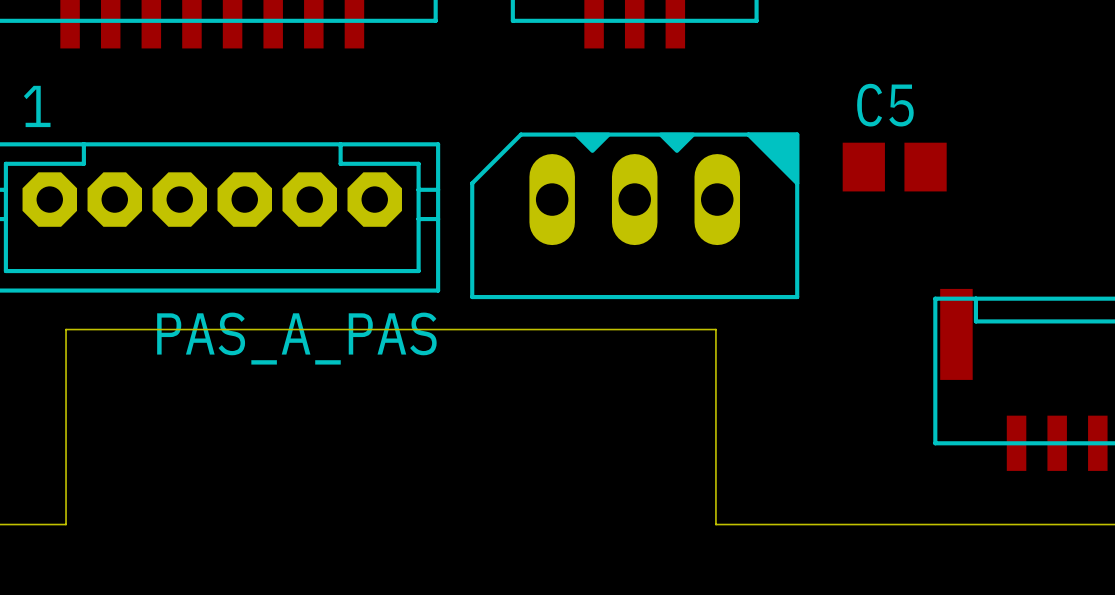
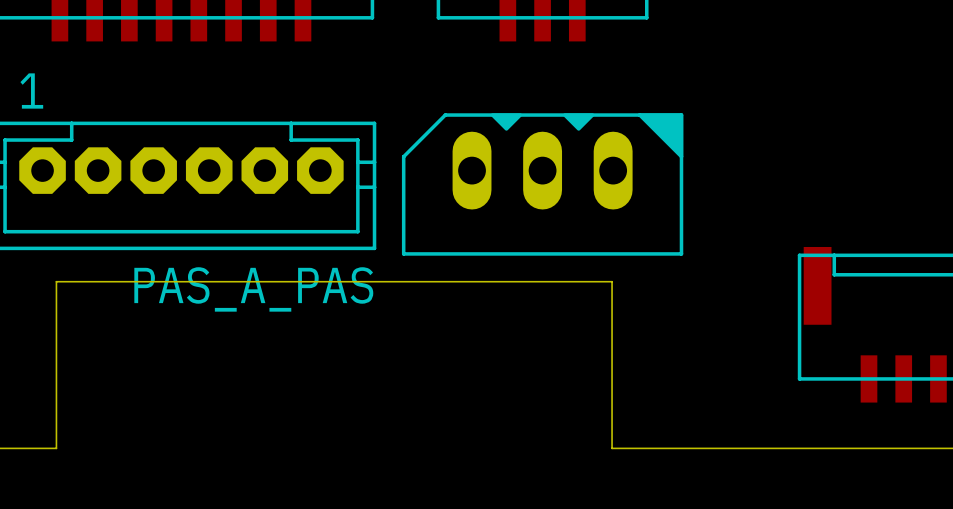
C5: (894, 167) -> none

